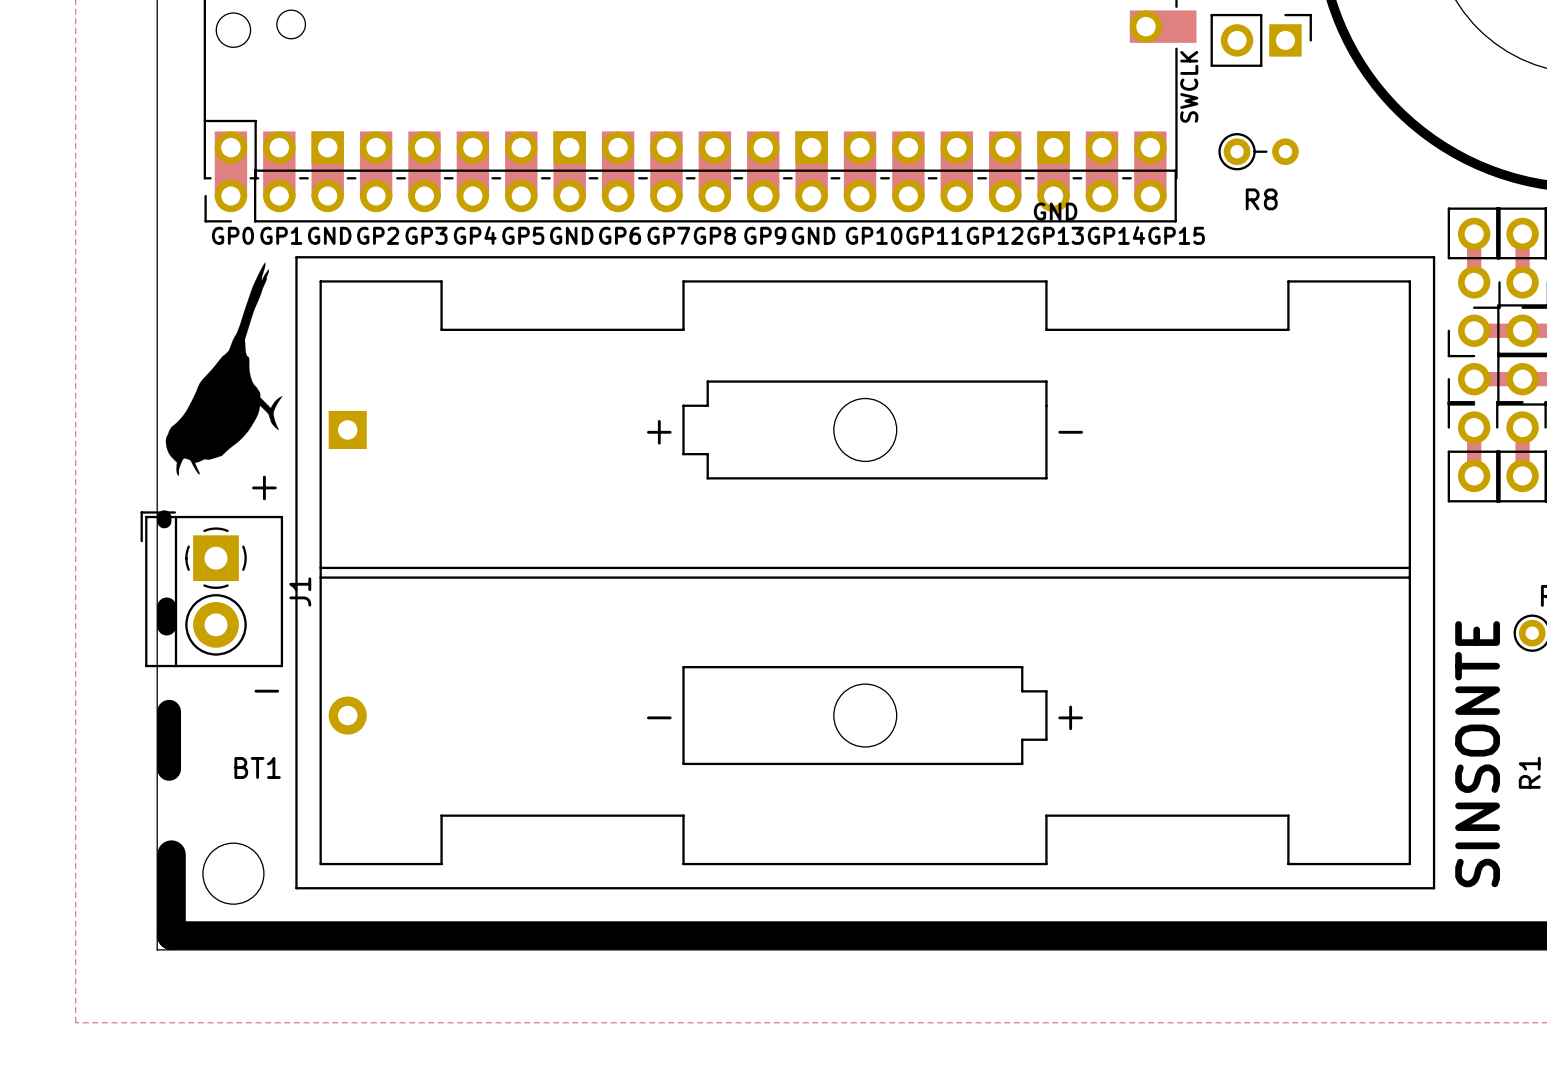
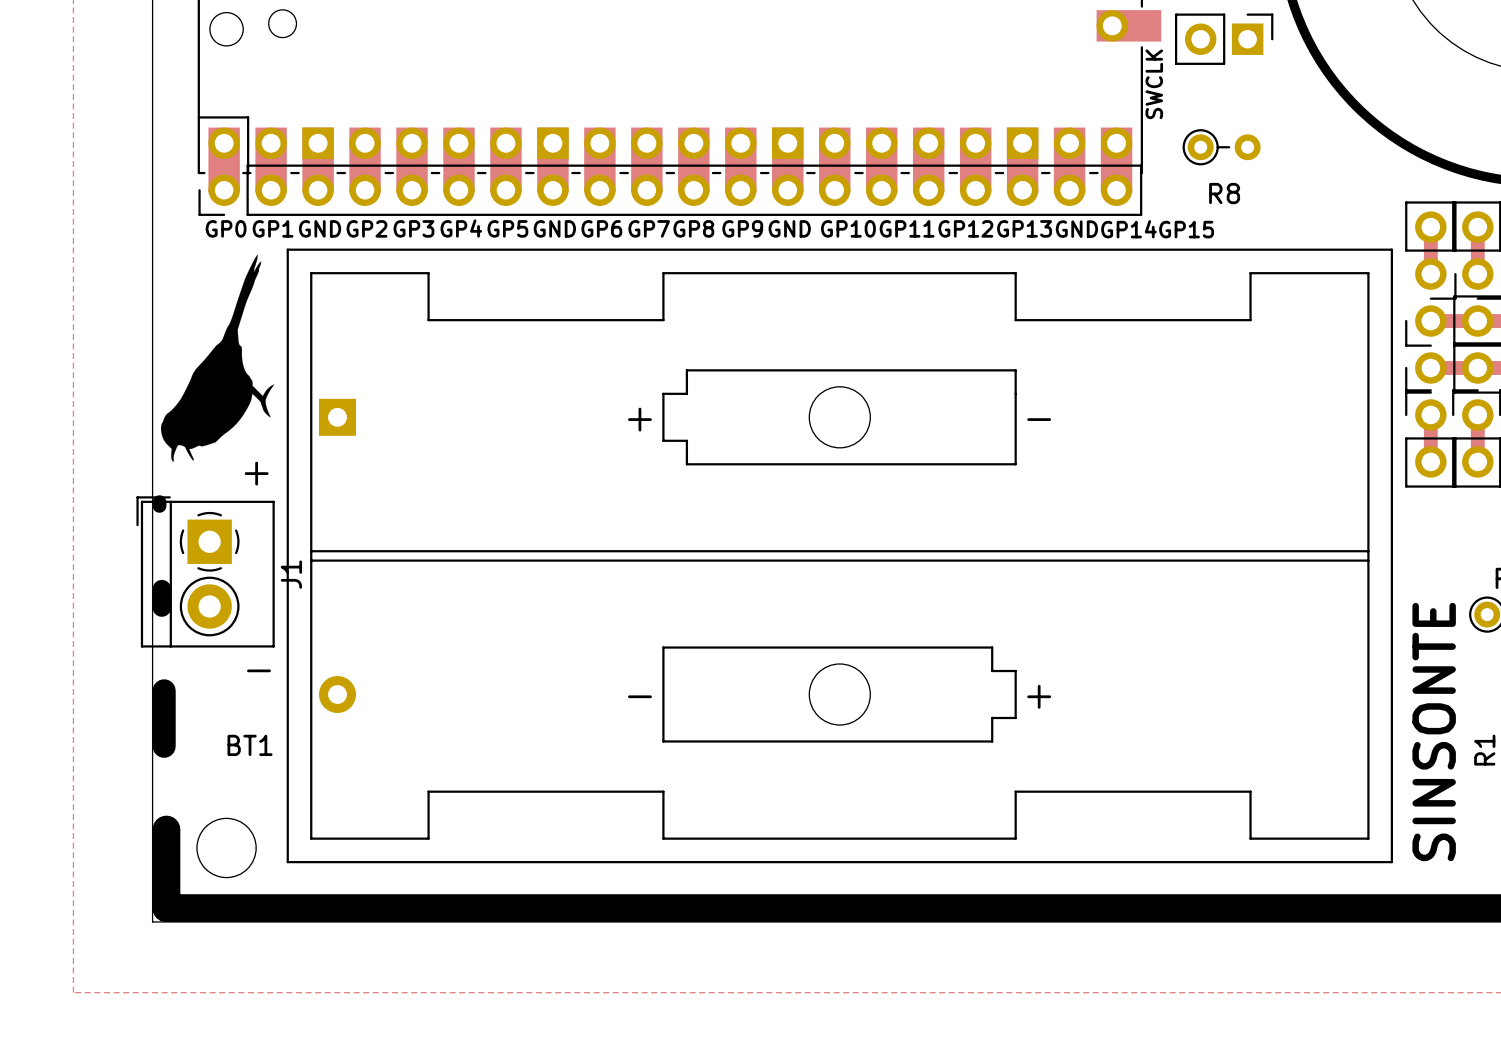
part text position: GND (1055, 211) -> GND (1076, 229)
part text position: GP14 (1116, 235) -> GP14 (1128, 229)
part text position: GP15 (1176, 235) -> GP15 (1186, 229)

